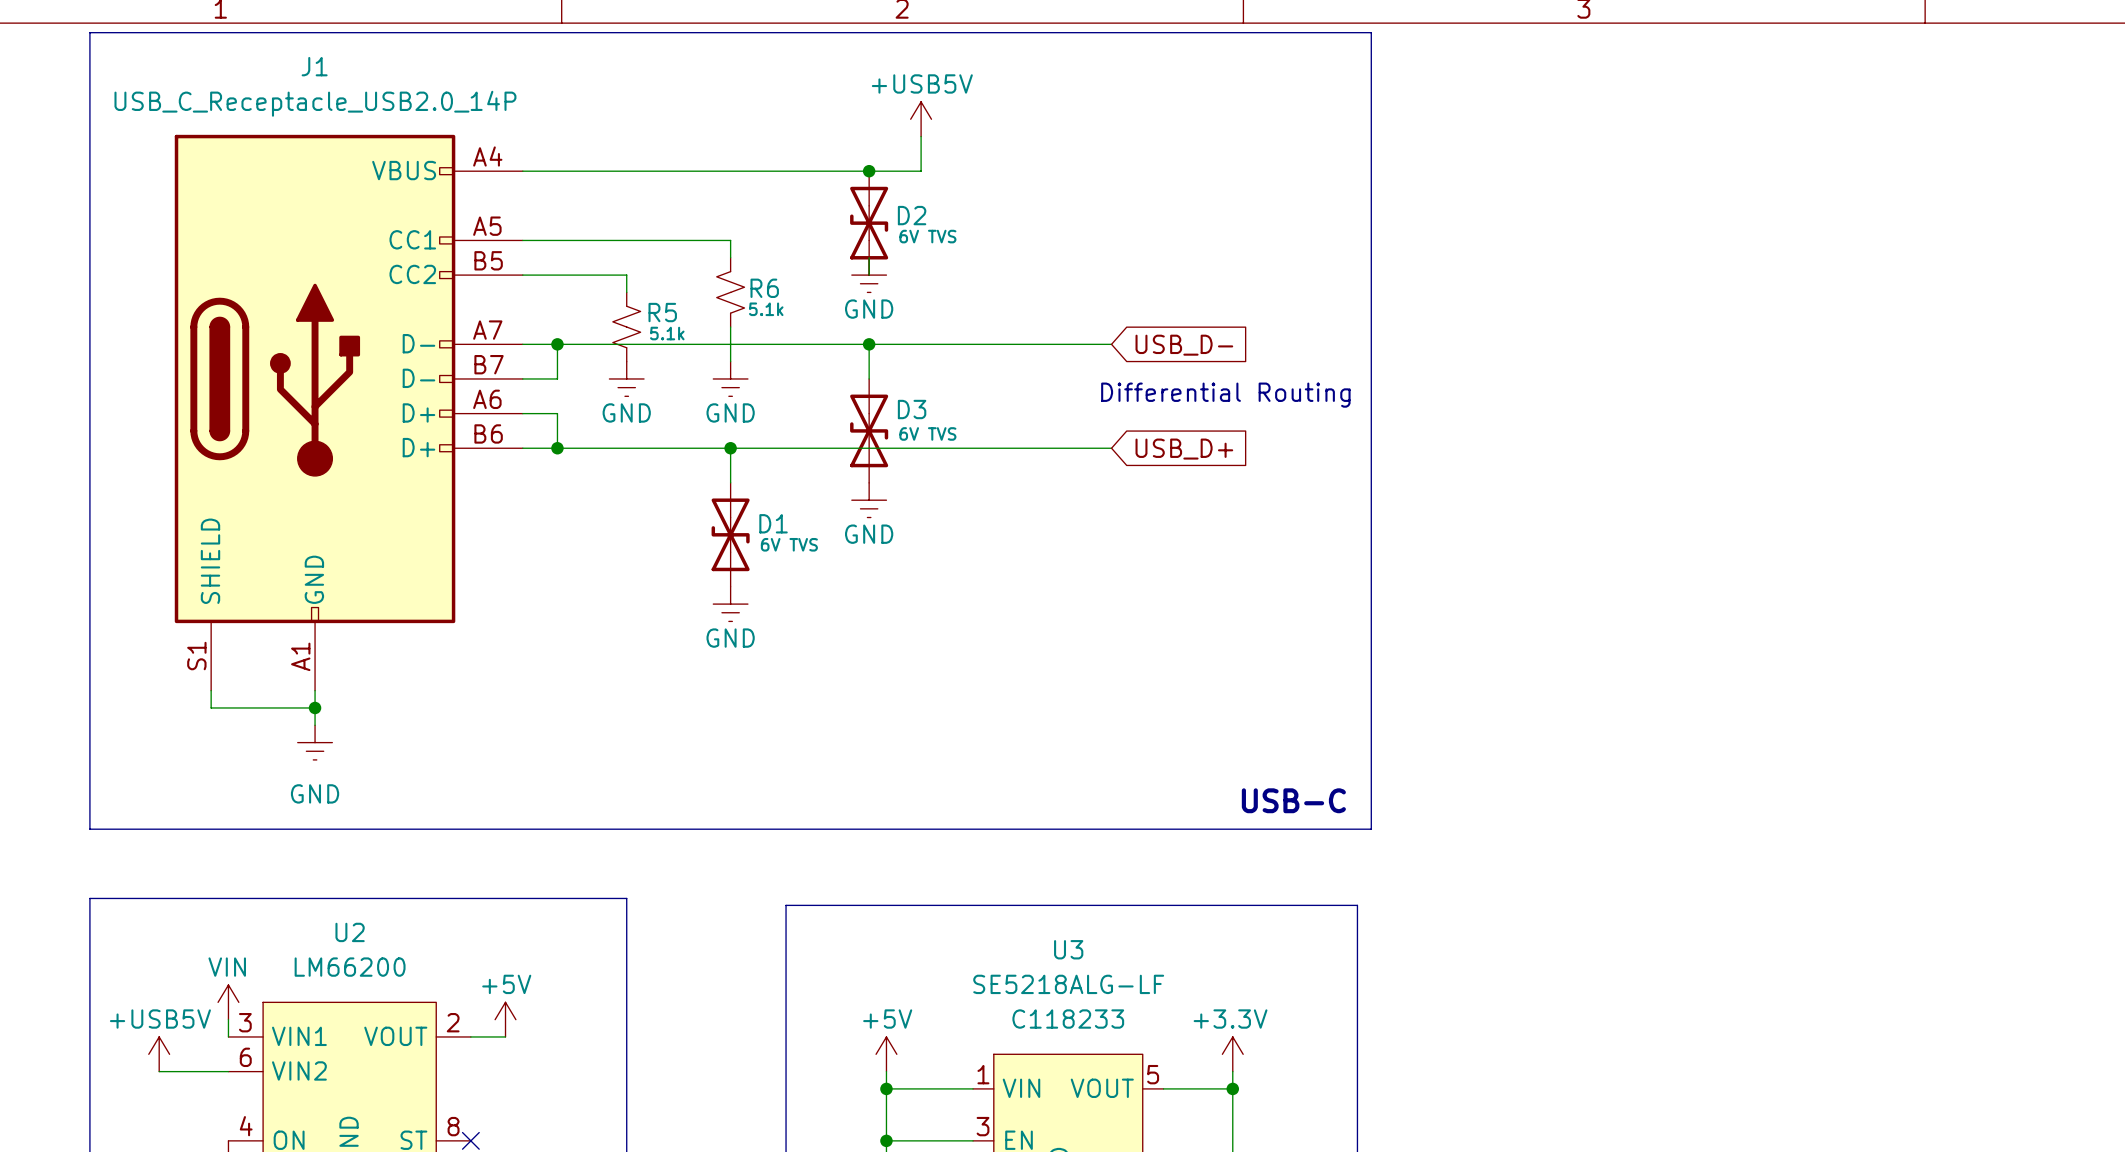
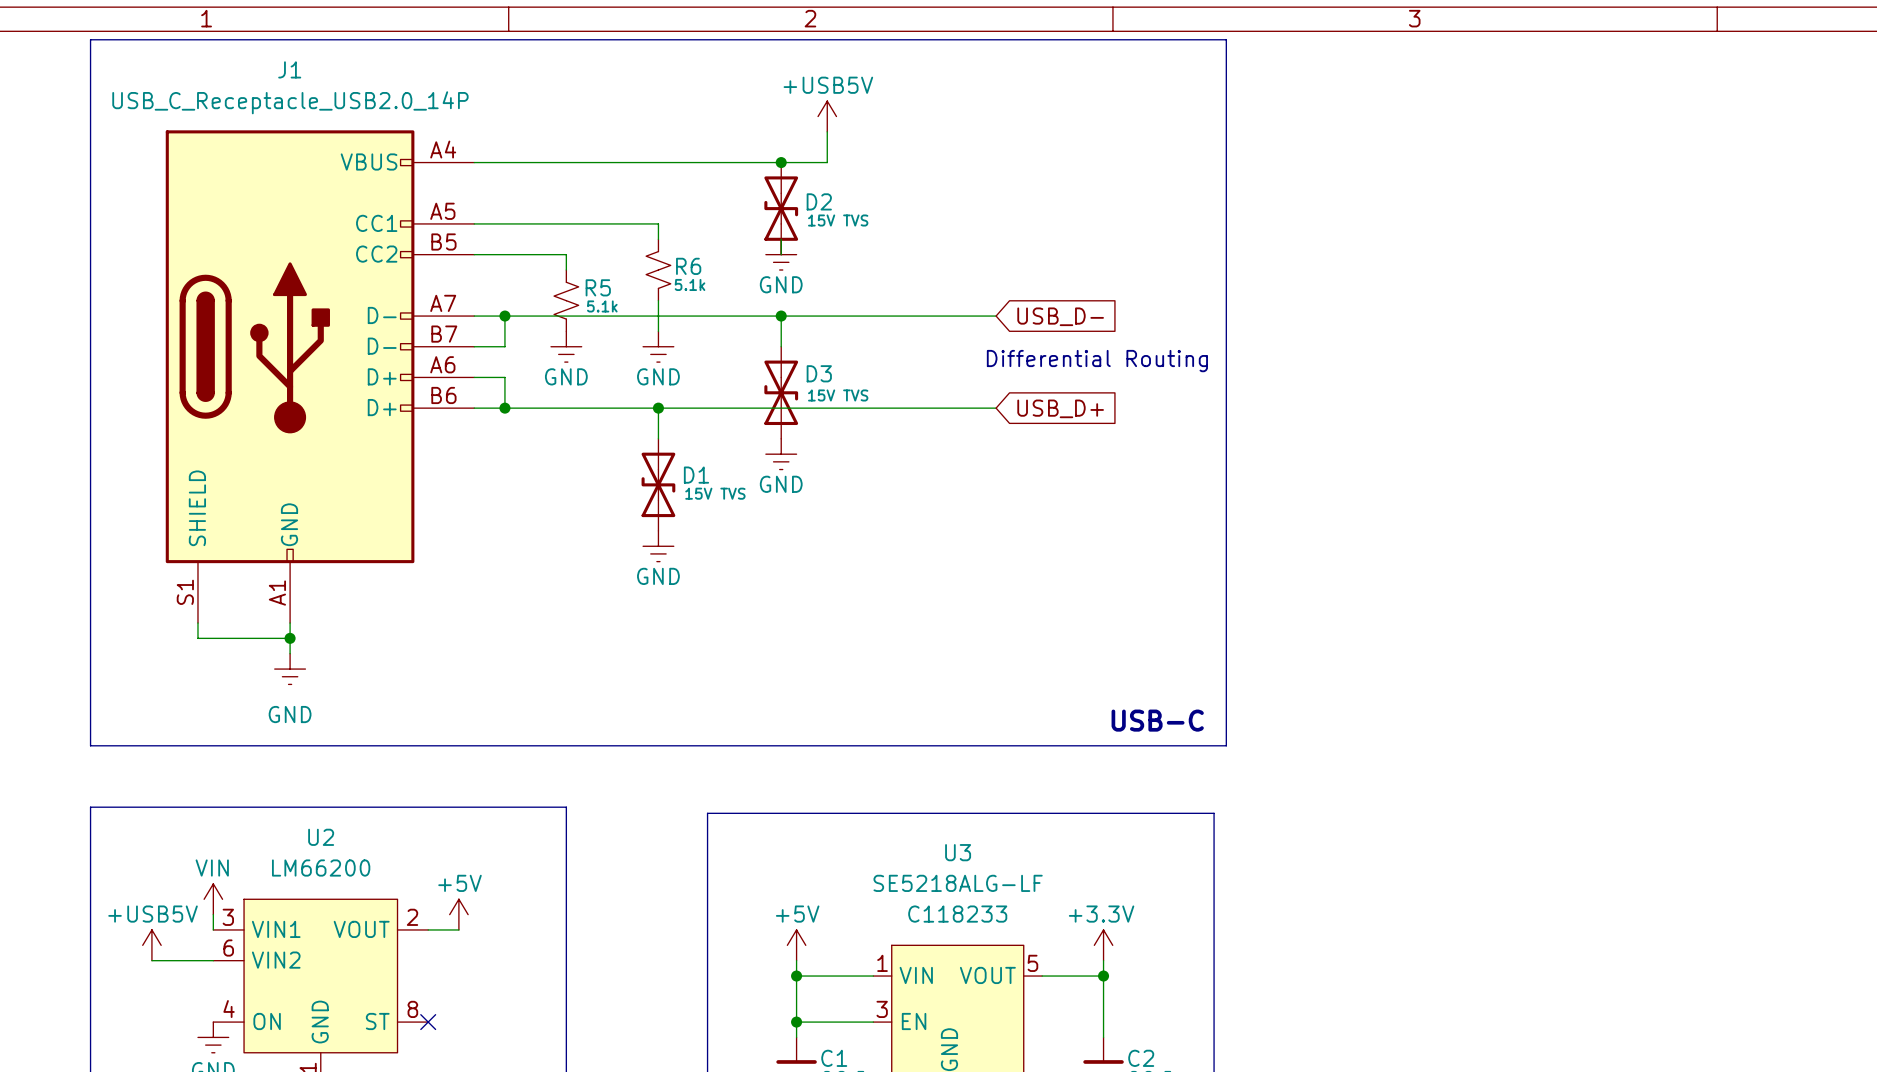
D2 value: 6V TVS (927, 236) -> 15V TVS (838, 220)
D3 value: 6V TVS (927, 433) -> 15V TVS (838, 395)
D1 value: 6V TVS (789, 544) -> 15V TVS (715, 493)

